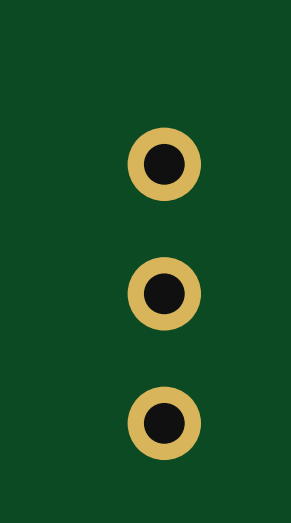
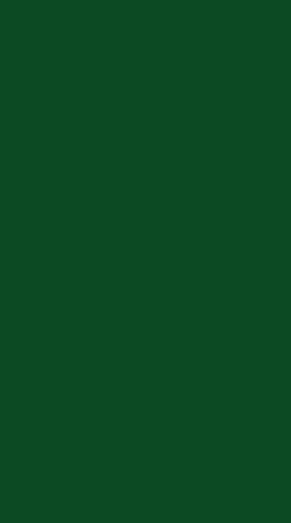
part: (164, 293) -> none

